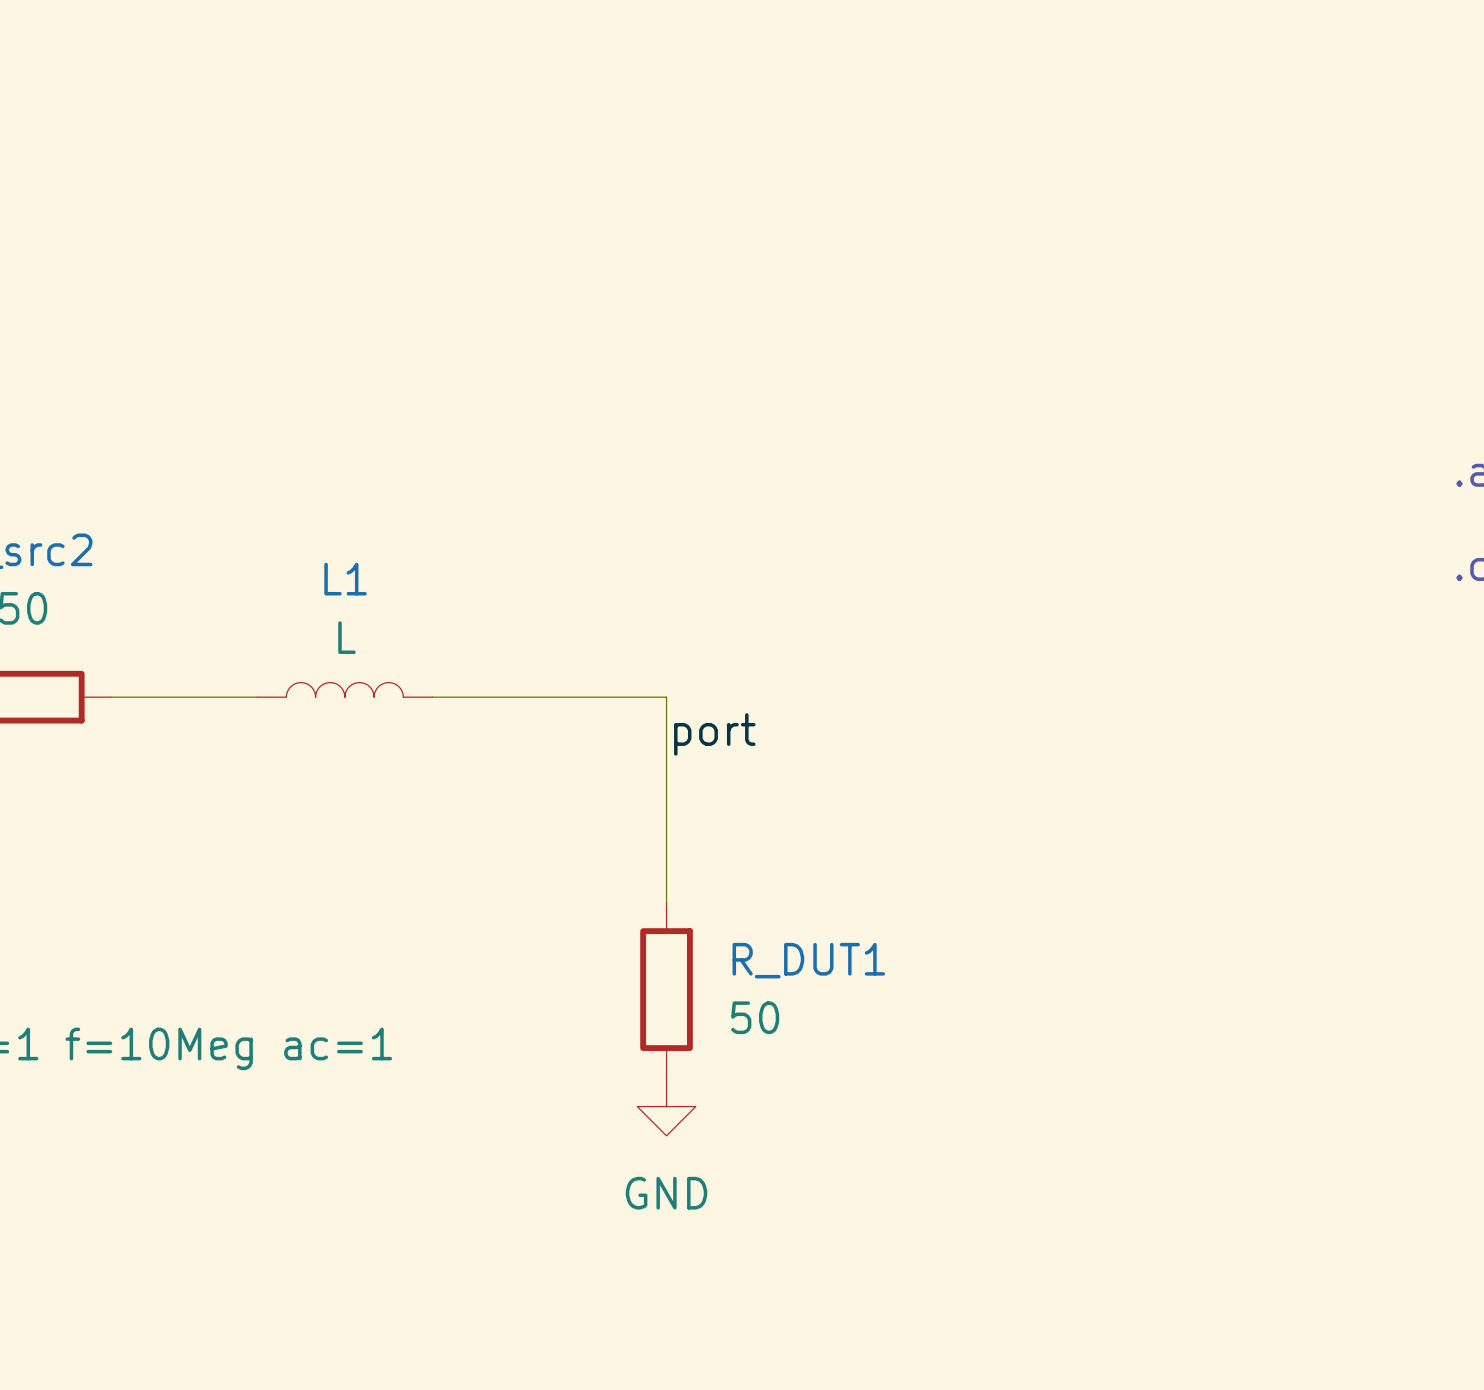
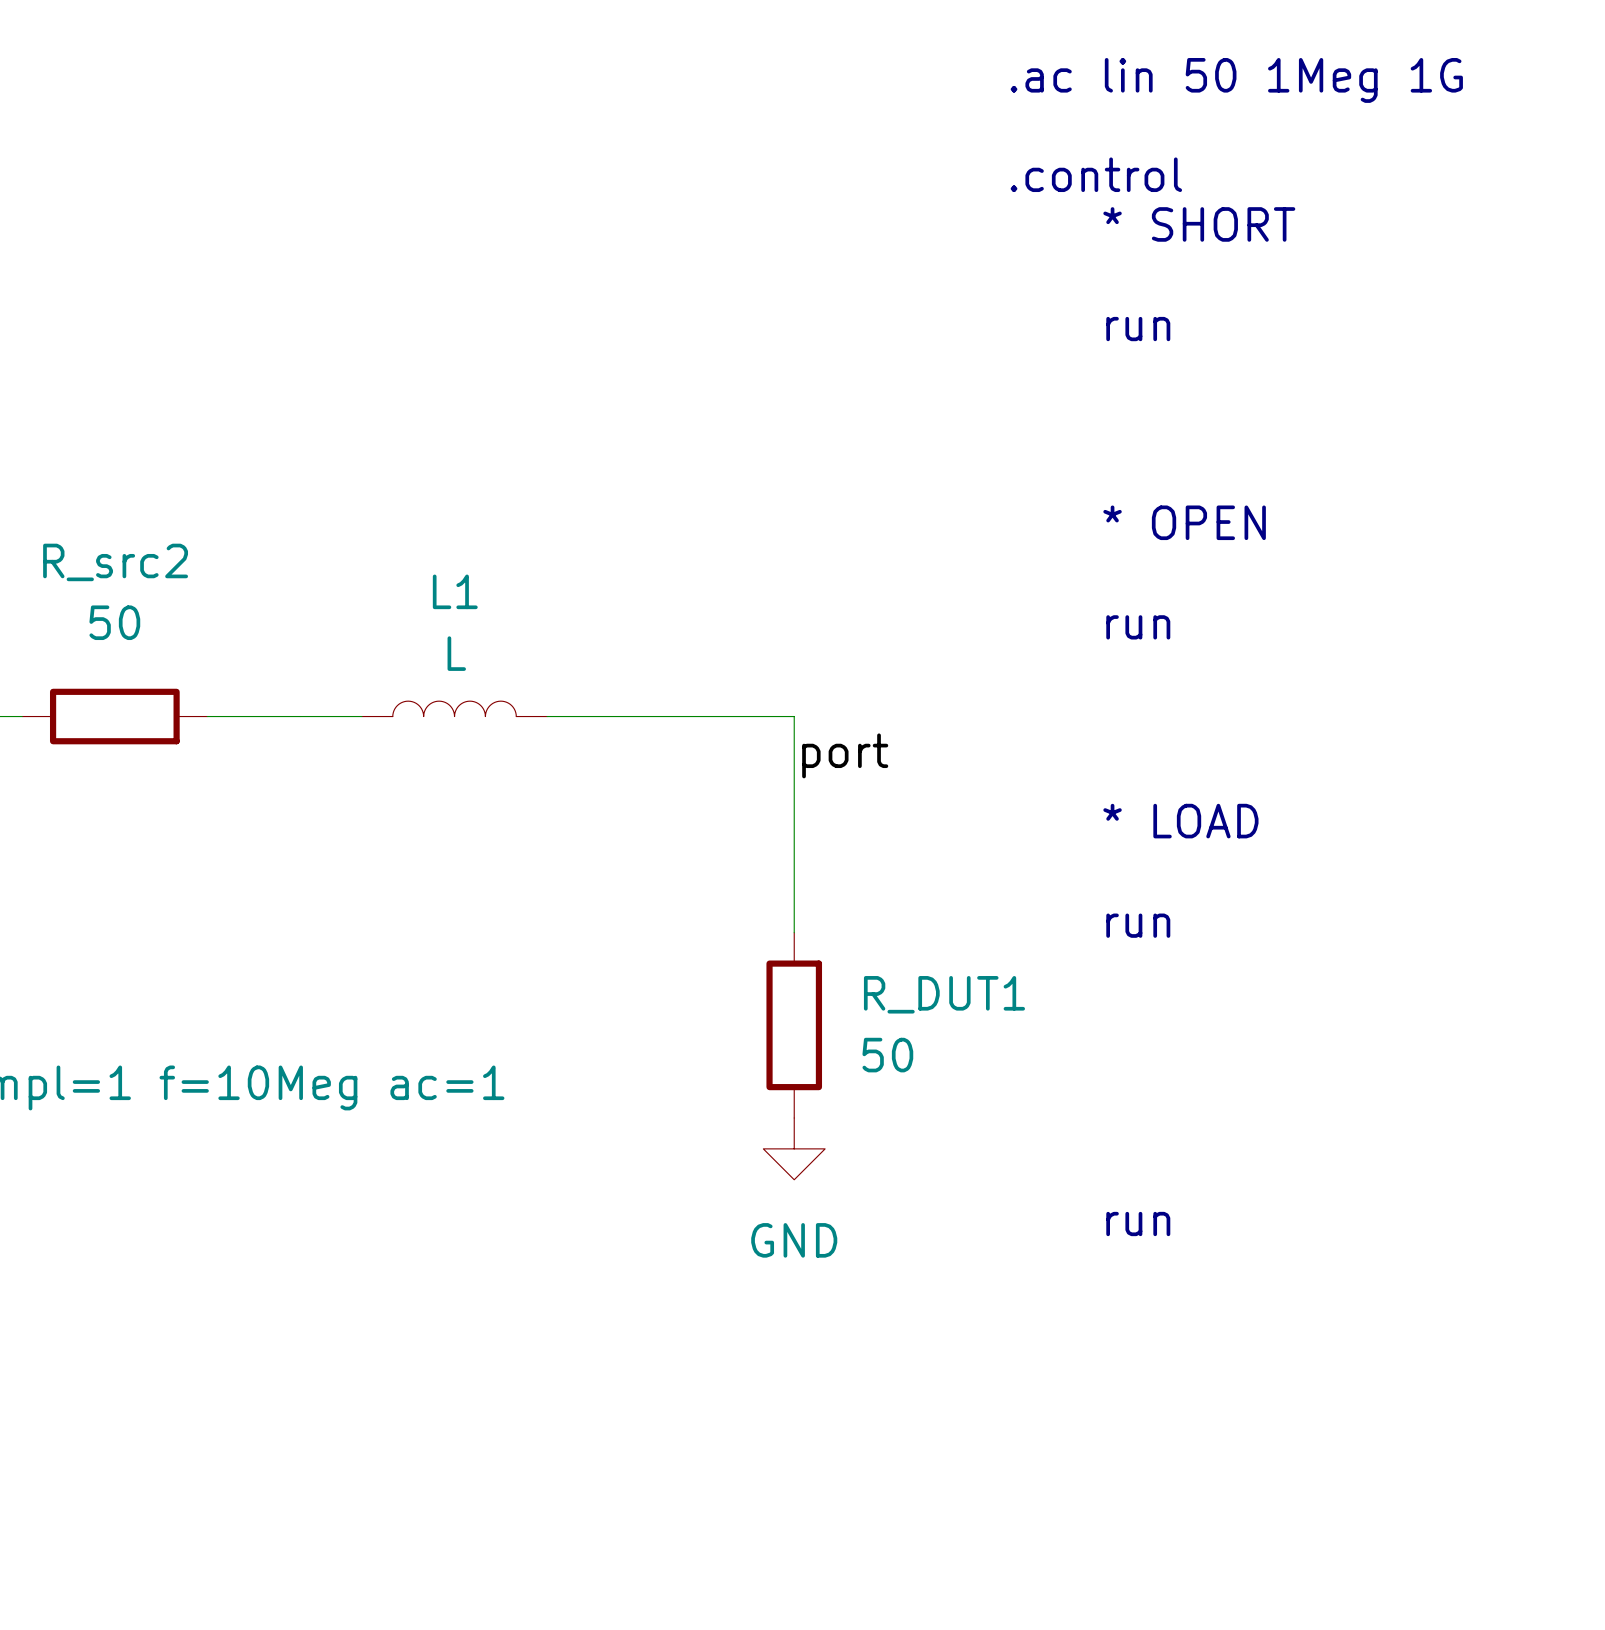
text: none -> .ac lin 50 1Meg 1G (1236, 80)
text: none -> .control (1096, 174)
text: none -> * SHORT (1199, 224)
text: none -> run (1138, 329)
text: none -> * OPEN (1184, 522)
text: none -> run (1138, 627)
text: none -> * LOAD (1180, 821)
text: none -> run (1138, 925)
text: none -> run (1138, 1224)

